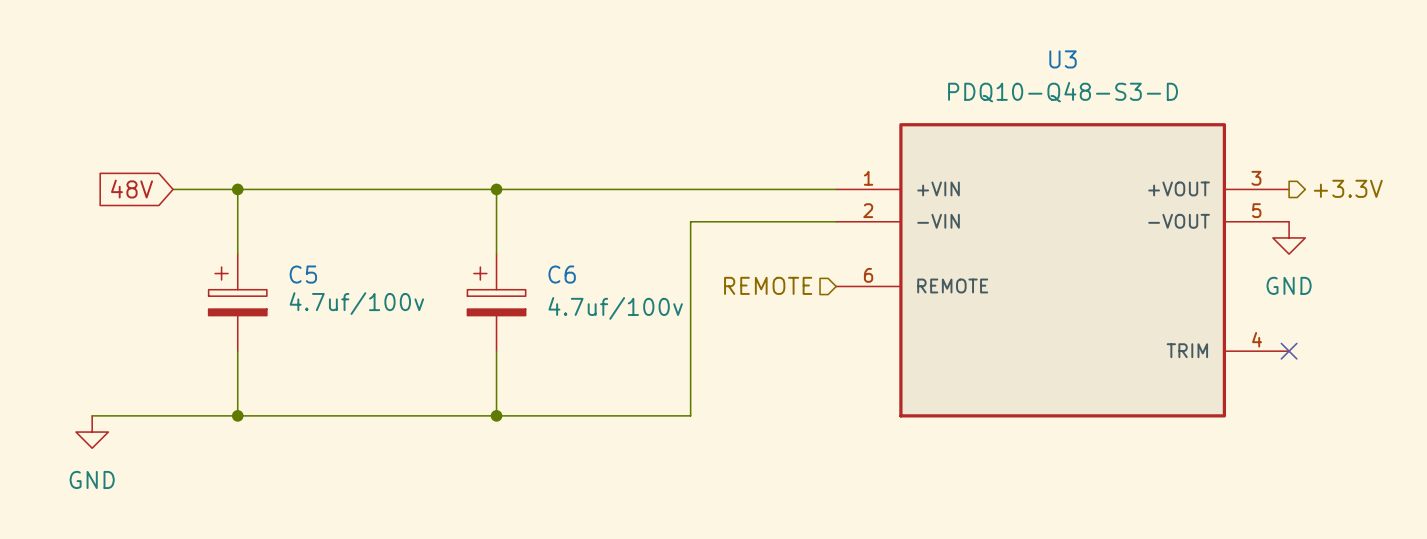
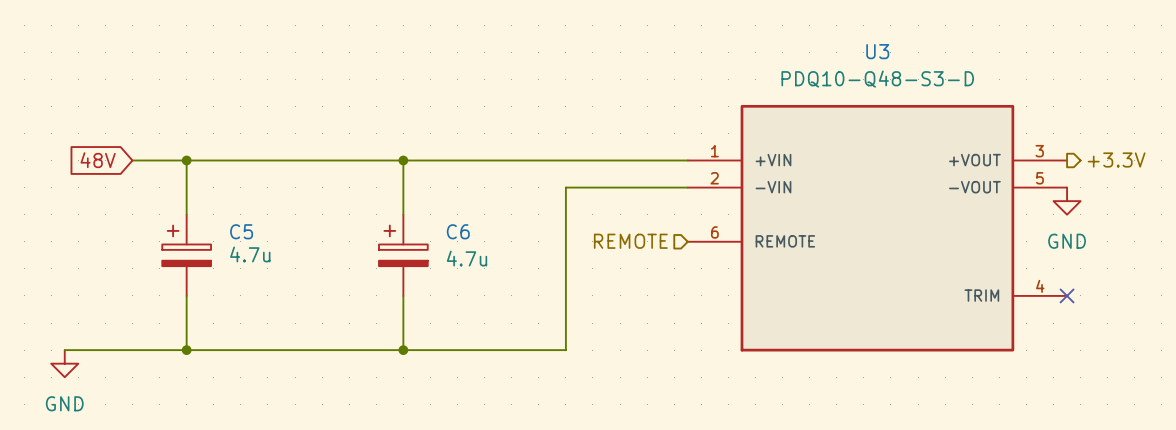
C5 value: 4.7uf/100v (356, 303) -> 4.7u (250, 254)
C6 value: 4.7uf/100v (615, 308) -> 4.7u (467, 258)

